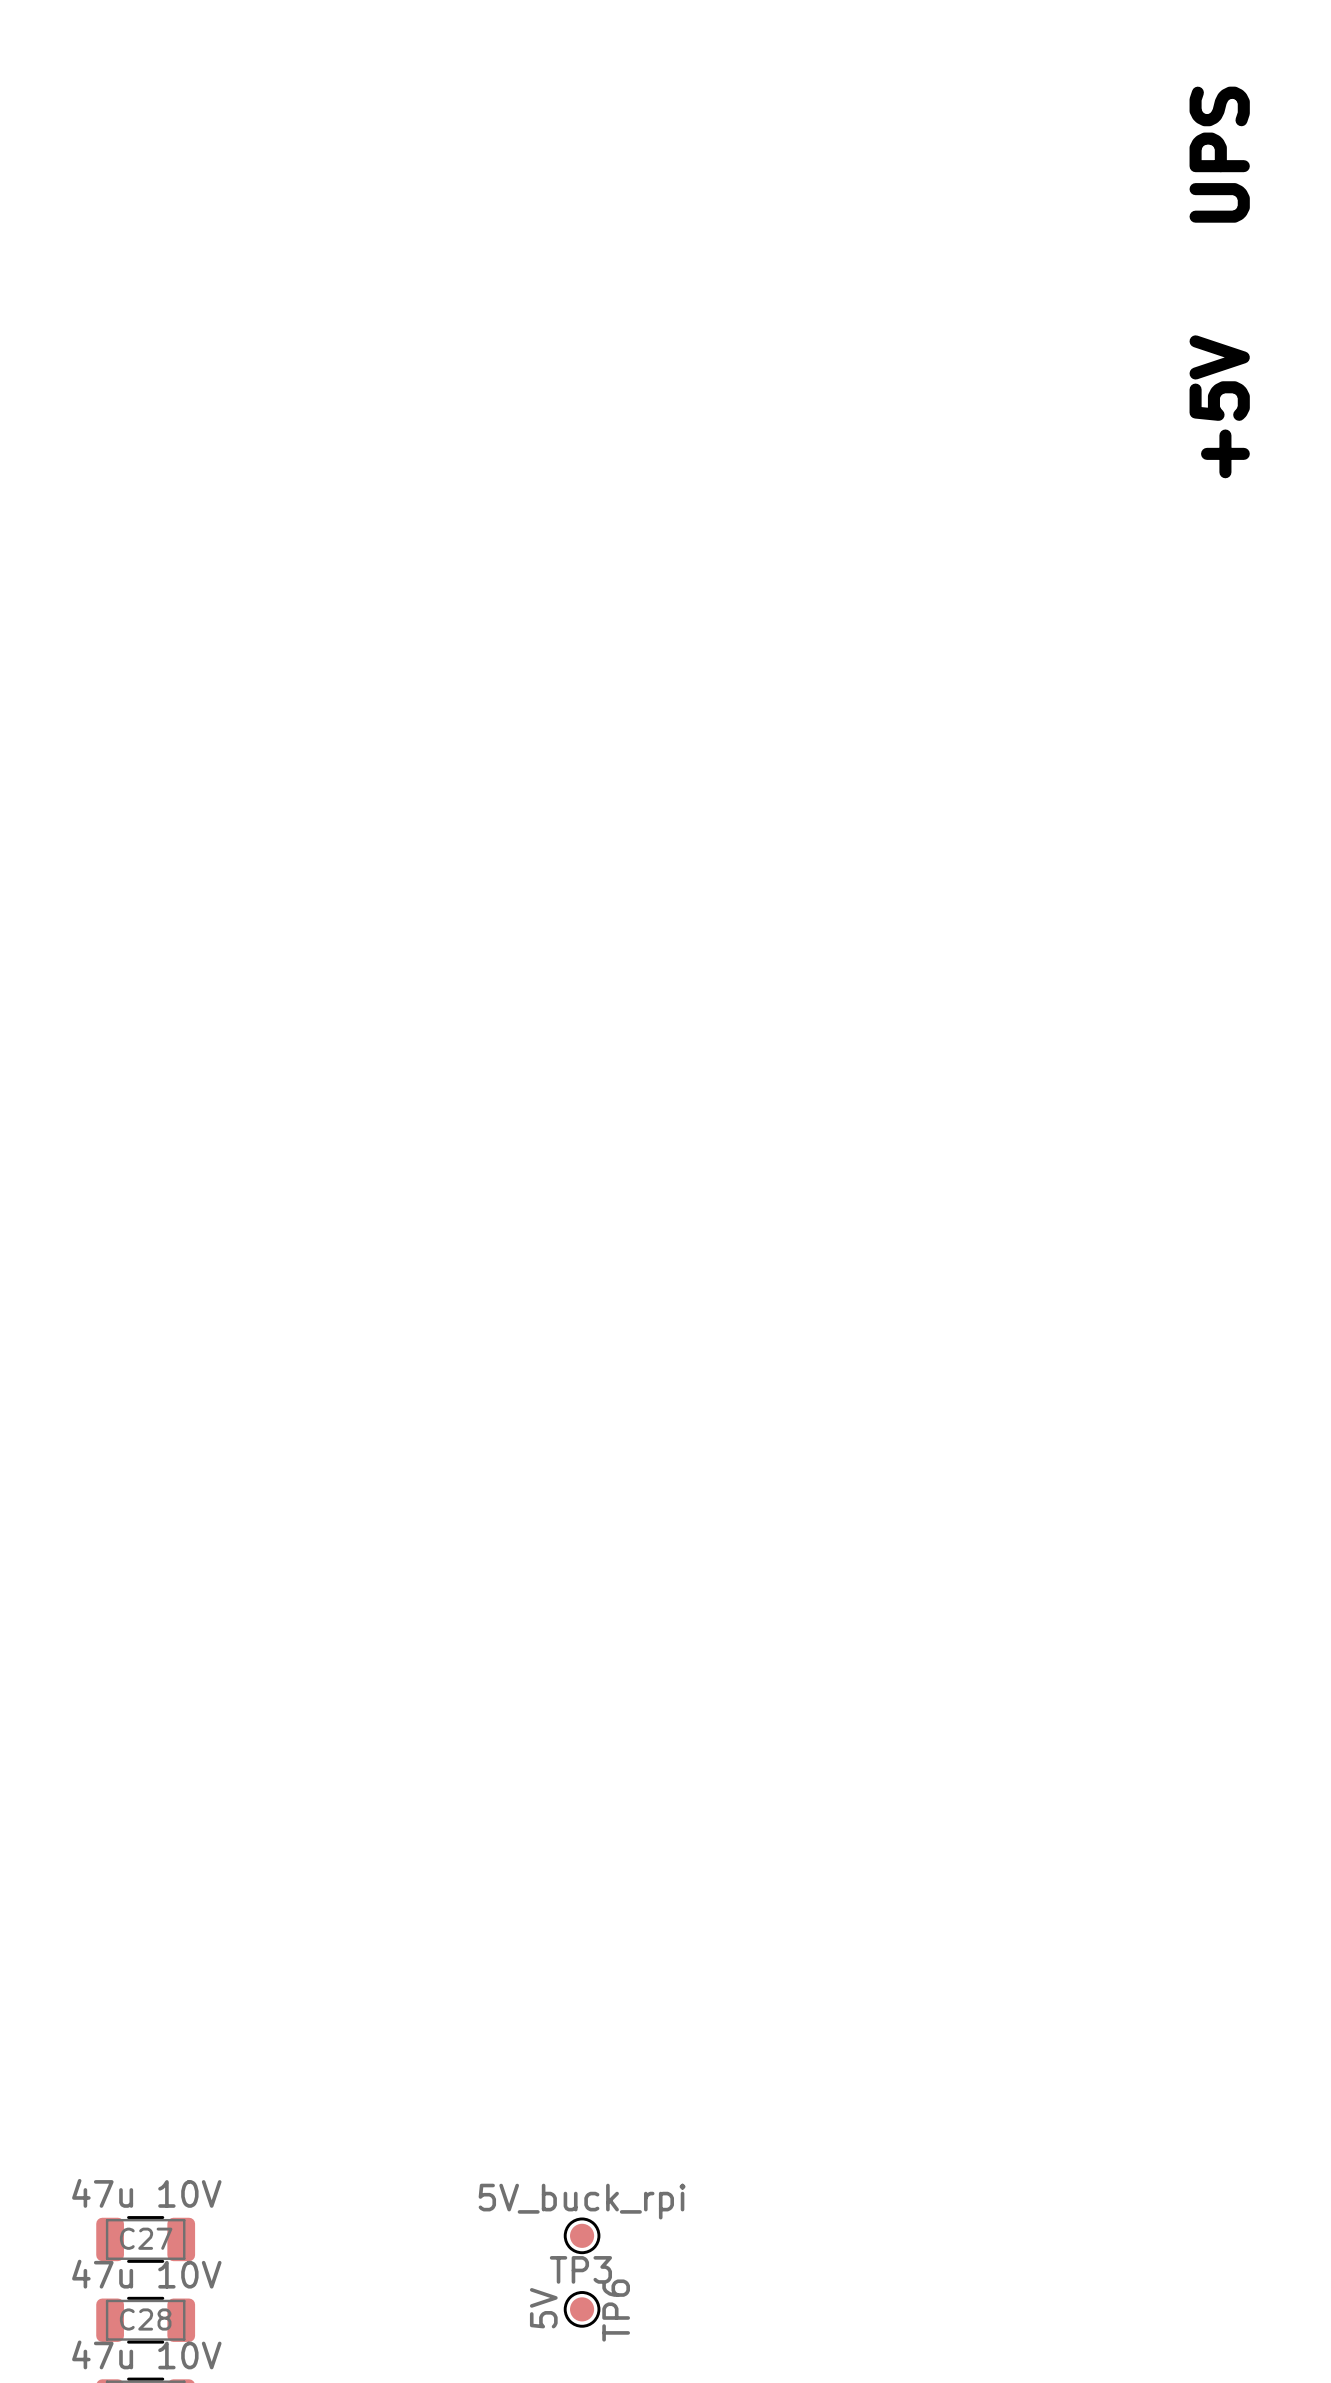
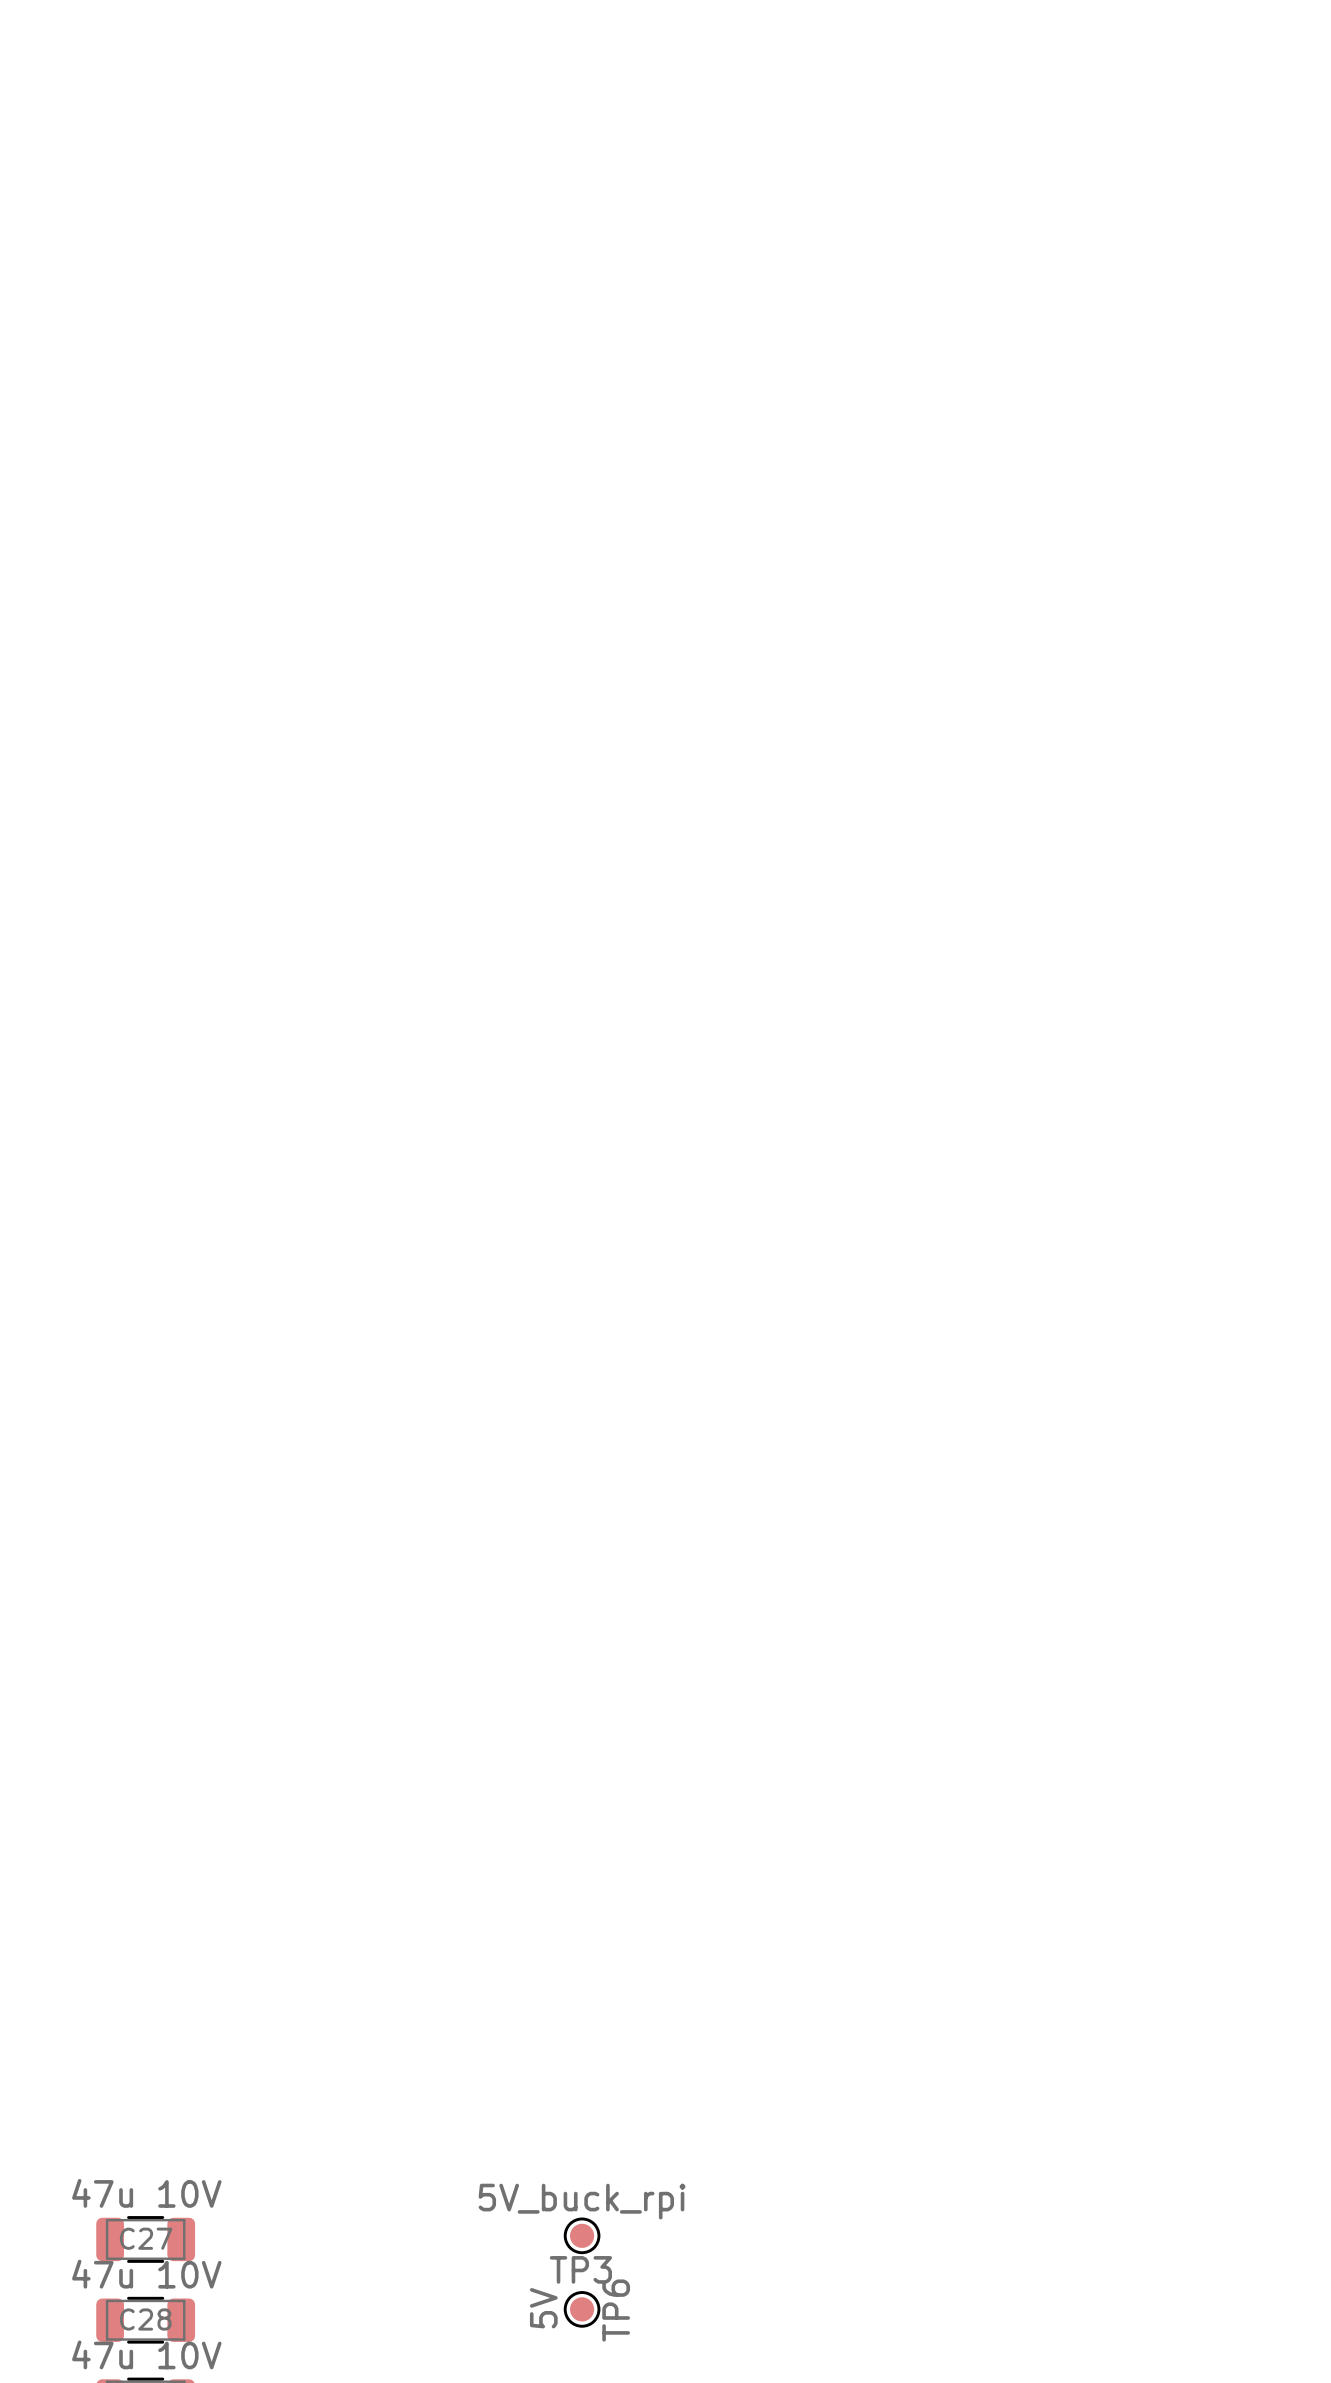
text: UPS (1219, 154) -> none
text: +5V (1219, 406) -> none

